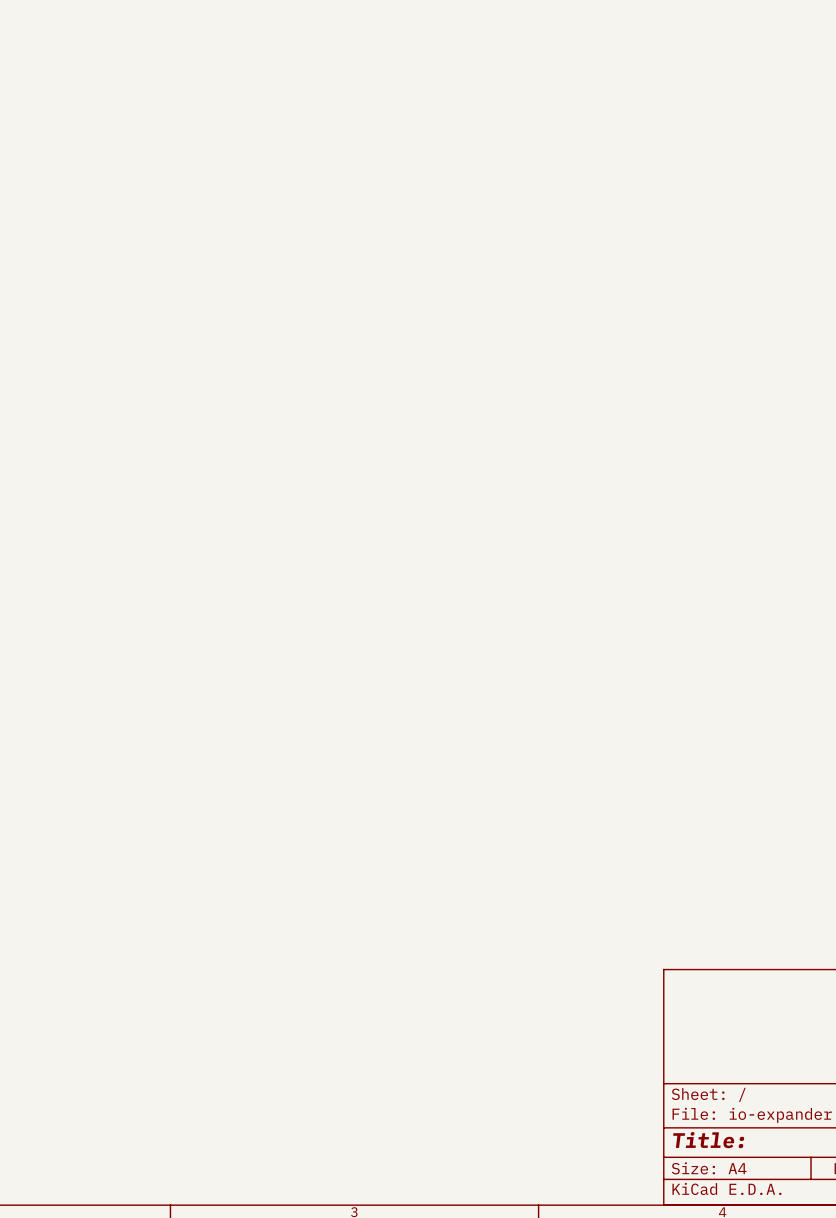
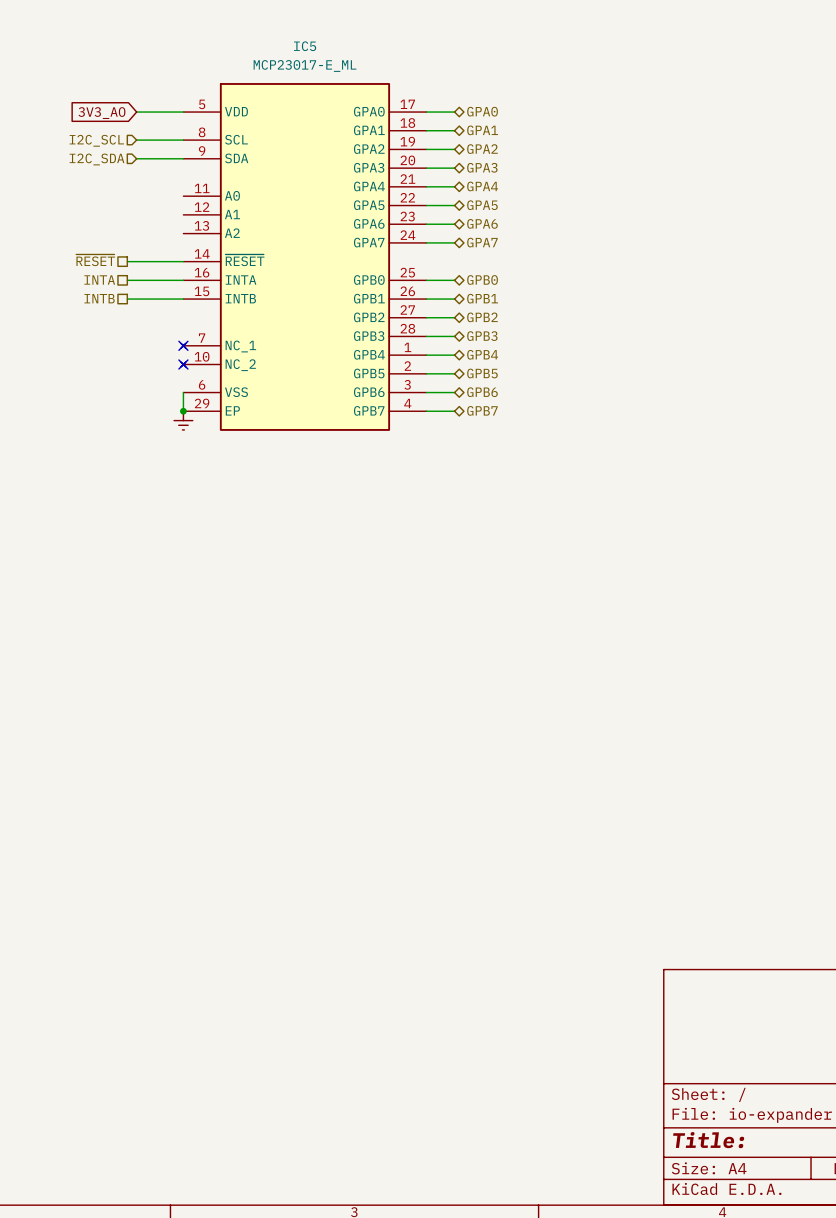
hierarchical label: none -> GPA0 (482, 111)
wire: none -> (136, 112) (183, 112)
wire: none -> (426, 112) (454, 112)
global label: none -> 3V3_AO (101, 113)
wire: none -> (426, 130) (454, 130)
hierarchical label: none -> GPA1 (482, 130)
hierarchical label: none -> I2C_SCL (96, 140)
wire: none -> (136, 140) (183, 140)
wire: none -> (426, 149) (454, 149)
hierarchical label: none -> GPA2 (482, 149)
wire: none -> (136, 158) (183, 158)
hierarchical label: none -> I2C_SDA (97, 159)
hierarchical label: none -> GPA3 (482, 167)
wire: none -> (426, 168) (454, 168)
wire: none -> (426, 186) (454, 186)
hierarchical label: none -> GPA4 (482, 186)
wire: none -> (426, 205) (454, 205)
hierarchical label: none -> GPA5 (482, 205)
hierarchical label: none -> GPA6 (482, 223)
wire: none -> (426, 224) (454, 224)
wire: none -> (426, 242) (454, 242)
hierarchical label: none -> GPA7 (482, 242)
IC5: none -> MCP23017-E_ML (303, 256)
hierarchical label: none -> ~{RESET} (95, 260)
wire: none -> (127, 261) (183, 261)
hierarchical label: none -> INTA (99, 279)
hierarchical label: none -> GPB0 (482, 279)
wire: none -> (127, 280) (183, 280)
wire: none -> (426, 280) (454, 280)
hierarchical label: none -> INTB (99, 298)
hierarchical label: none -> GPB1 (482, 298)
wire: none -> (127, 299) (183, 299)
wire: none -> (426, 299) (454, 299)
wire: none -> (426, 317) (454, 317)
hierarchical label: none -> GPB2 (482, 317)
wire: none -> (426, 336) (454, 336)
hierarchical label: none -> GPB3 (482, 336)
no-connect mark: none -> (183, 345)
hierarchical label: none -> GPB4 (482, 354)
wire: none -> (426, 355) (454, 355)
no-connect mark: none -> (183, 364)
wire: none -> (426, 373) (454, 373)
hierarchical label: none -> GPB5 (482, 373)
wire: none -> (183, 392) (183, 411)
wire: none -> (426, 392) (454, 392)
hierarchical label: none -> GPB6 (482, 392)
hierarchical label: none -> GPB7 (482, 410)
junction: none -> (183, 411)
wire: none -> (426, 411) (454, 411)
power symbol: none -> (183, 420)

